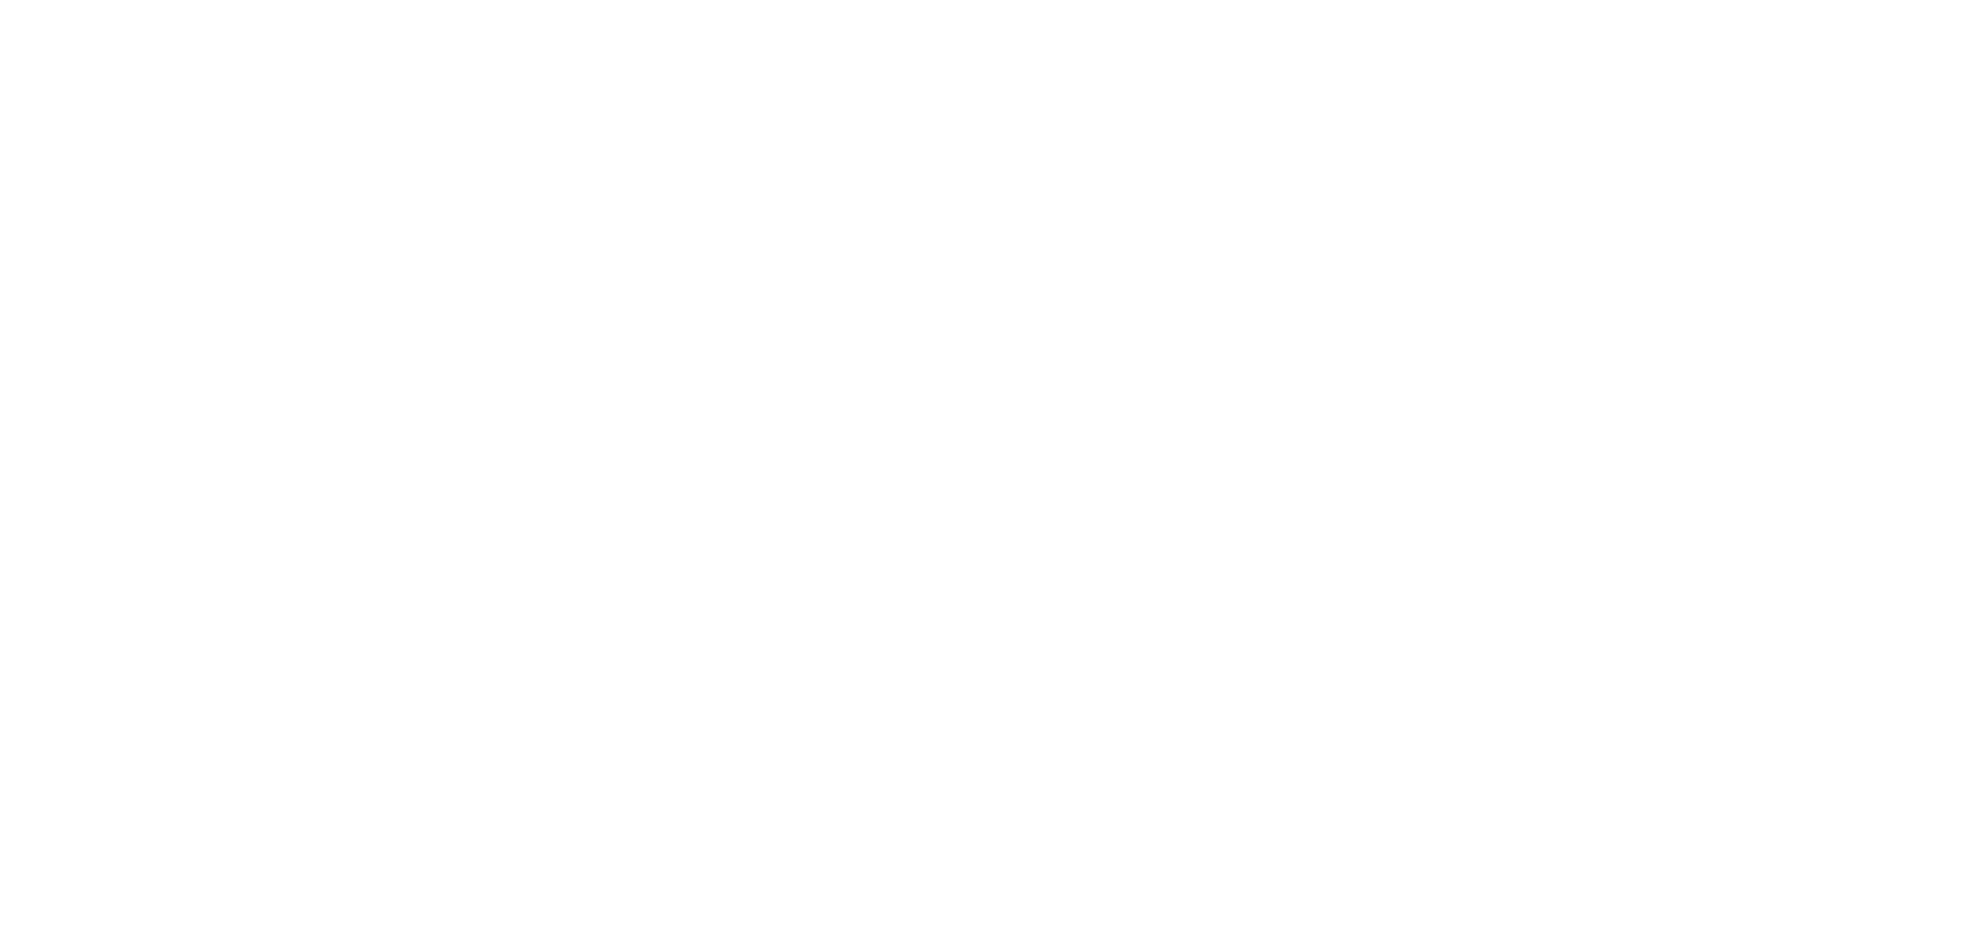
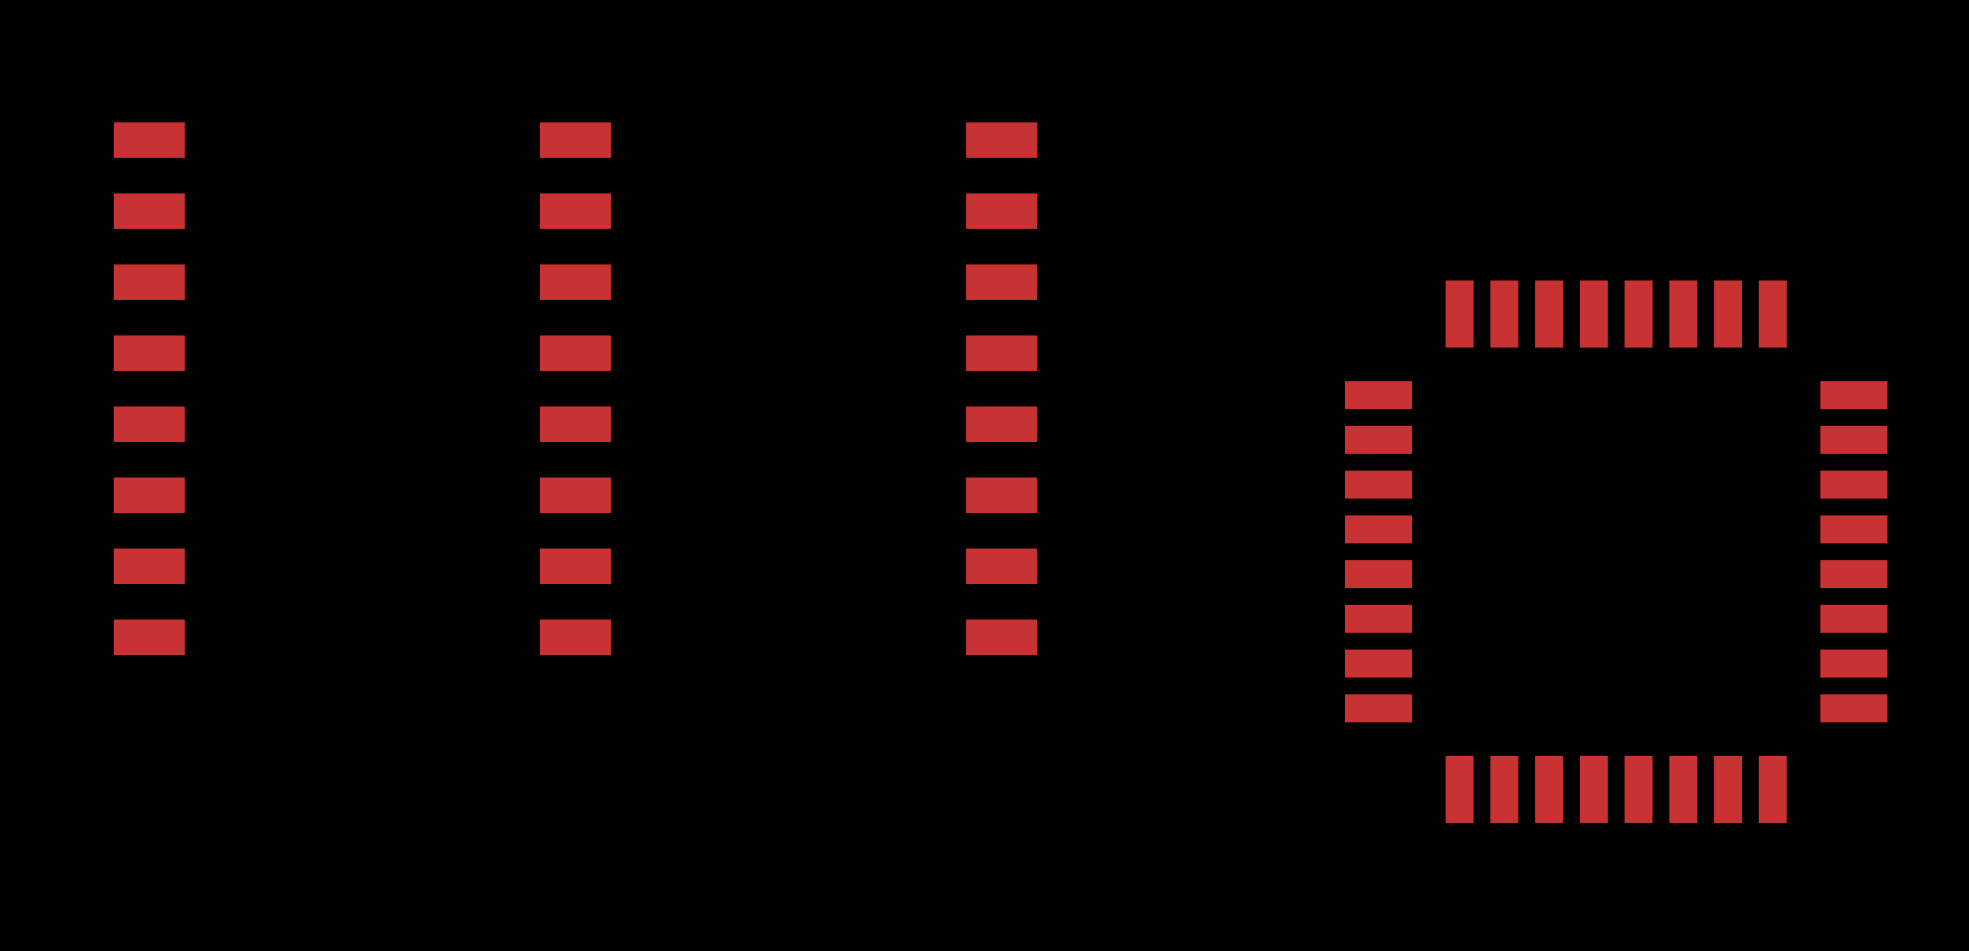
part: none -> (149, 388)
part: none -> (575, 388)
part: none -> (1001, 388)
part: none -> (1616, 551)

